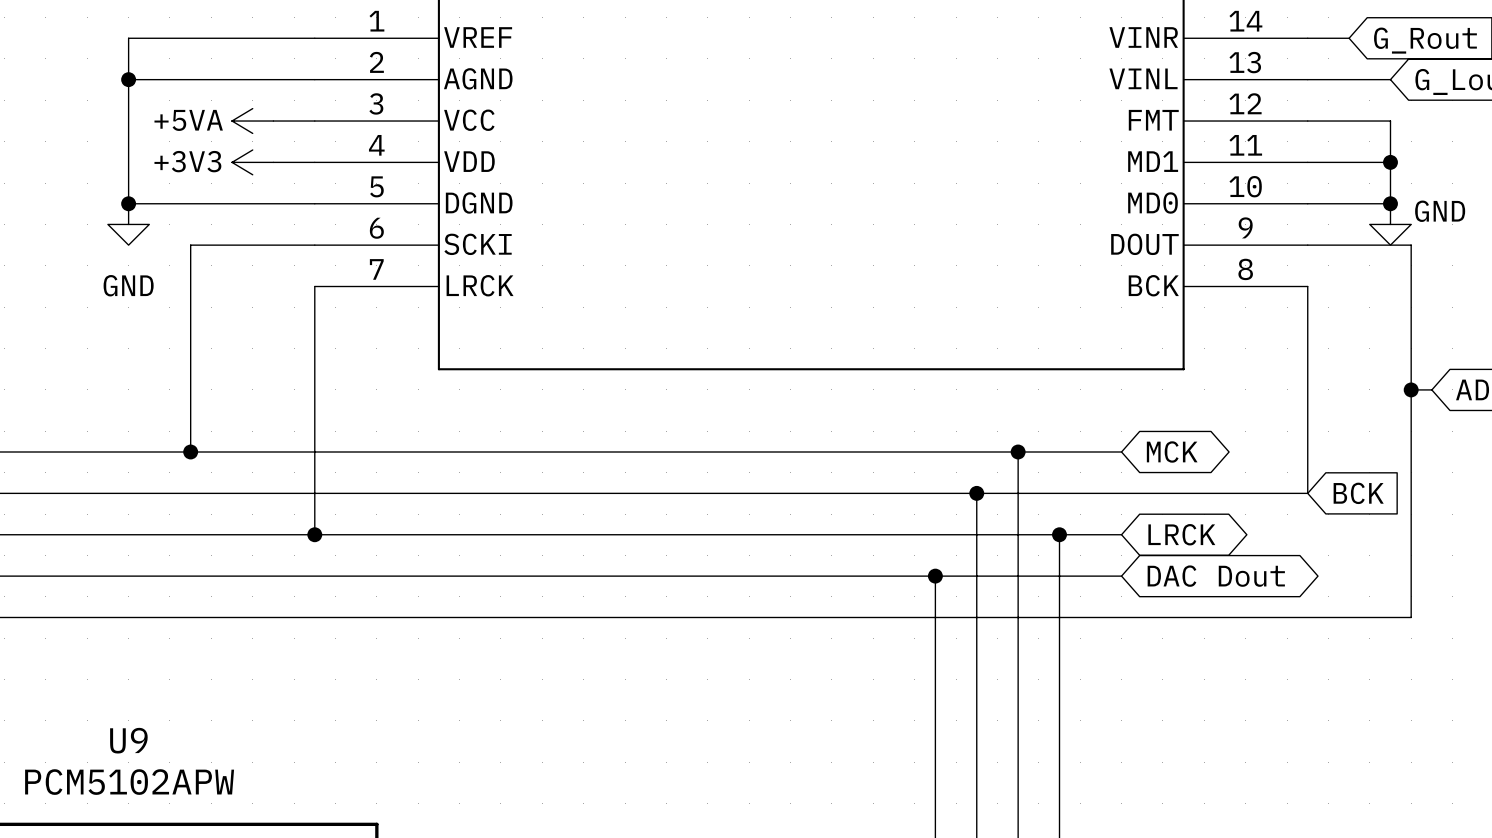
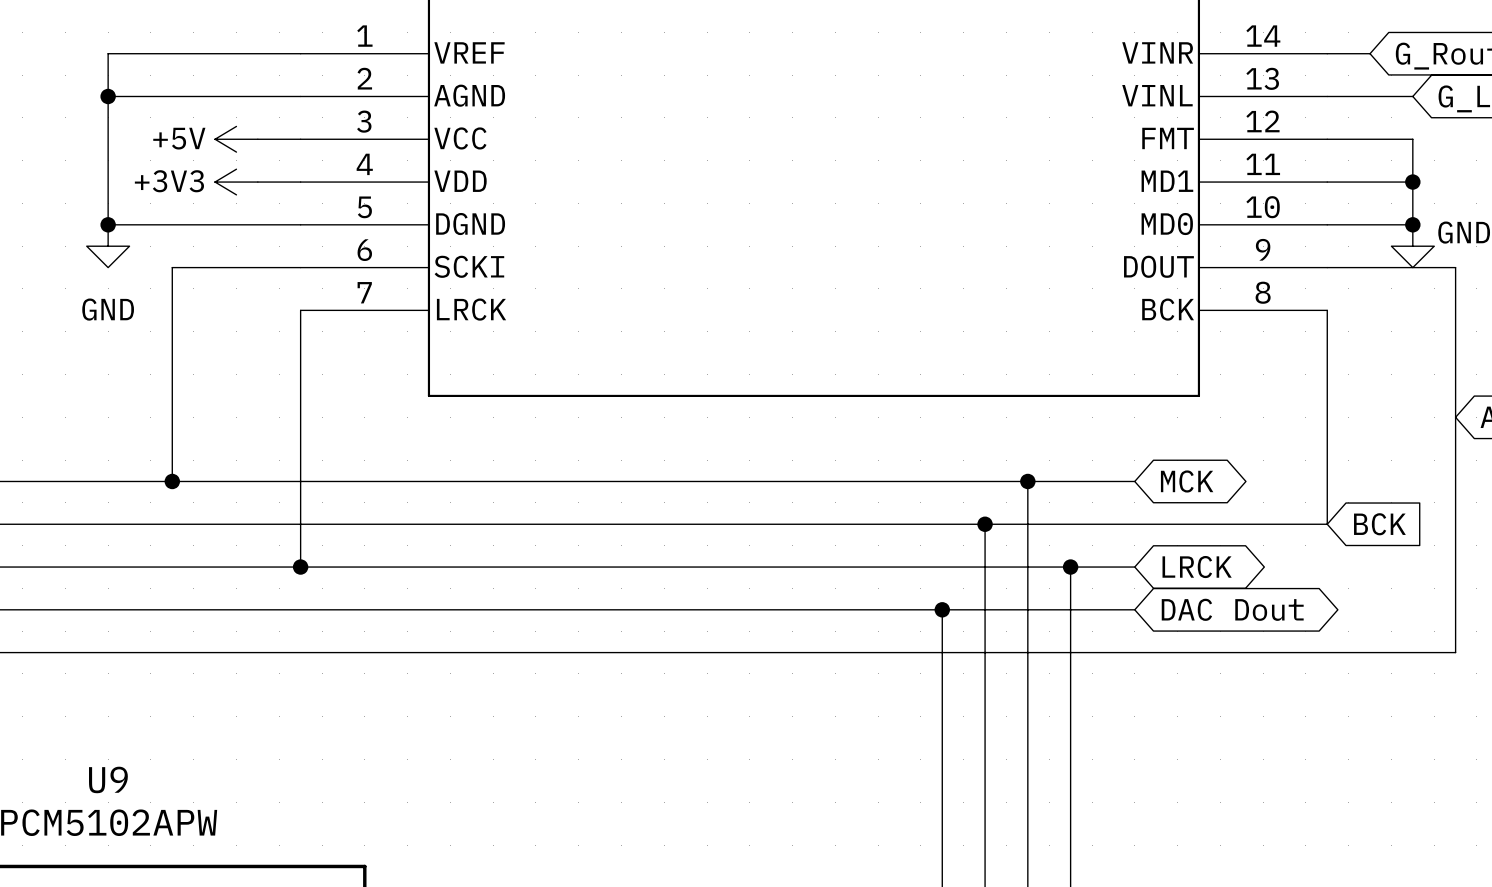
power symbol: +5VA (252, 121) -> +5V (236, 139)
wire: (1411, 245) (1411, 617) -> (1434, 267) (1455, 267) (1455, 652) (1434, 652)
wire: (1411, 389) (1431, 389) -> none
junction: (1411, 389) -> none

